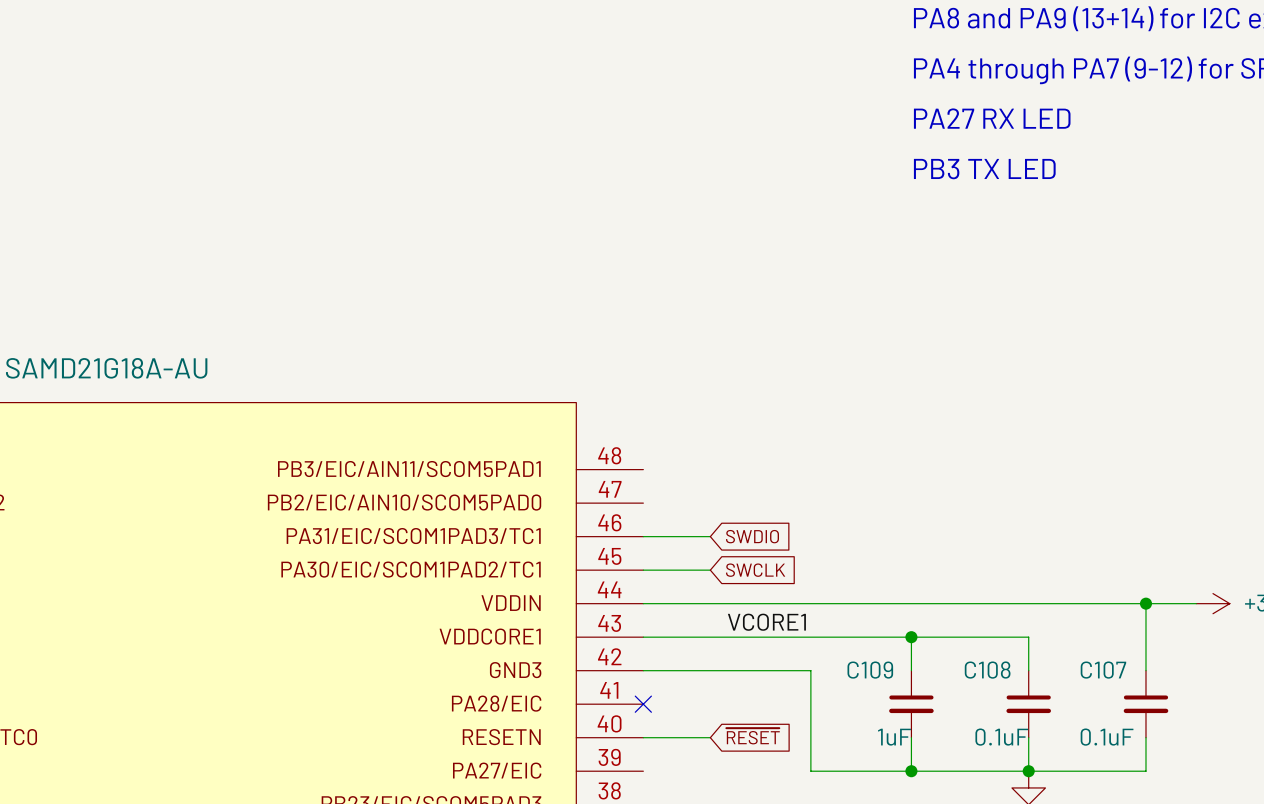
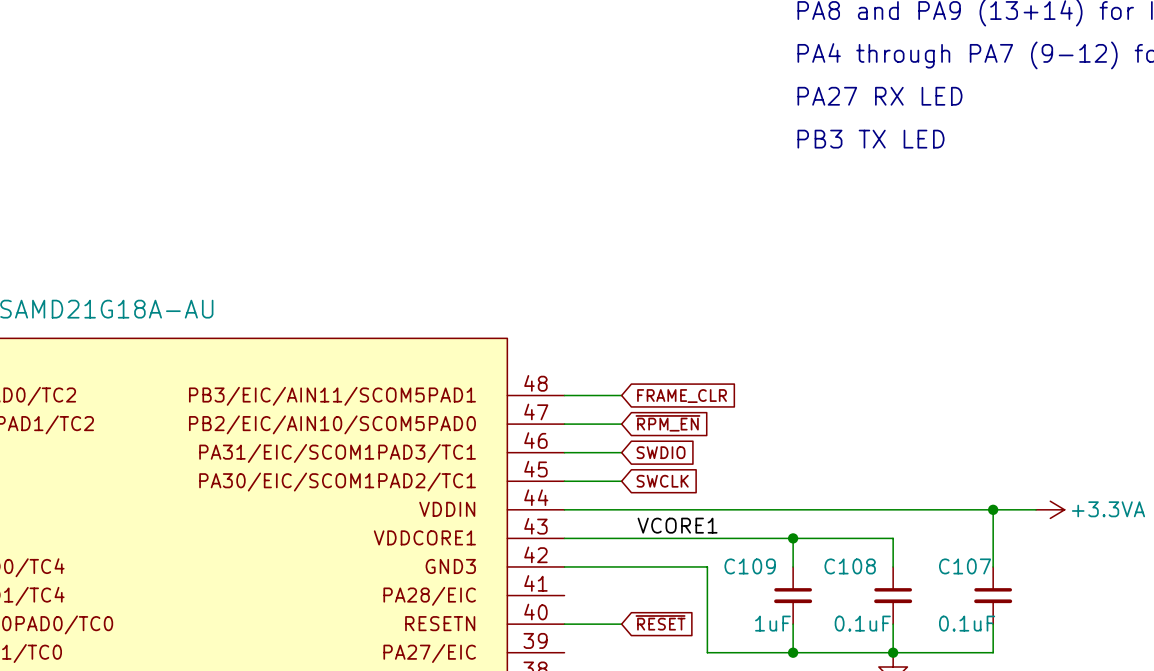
wire: none -> (564, 395) (621, 395)
global label: none -> FRAME_CLR (682, 396)
global label: none -> ~{RPM_EN} (667, 423)
wire: none -> (564, 424) (621, 424)
no-connect mark: (643, 704) -> none

